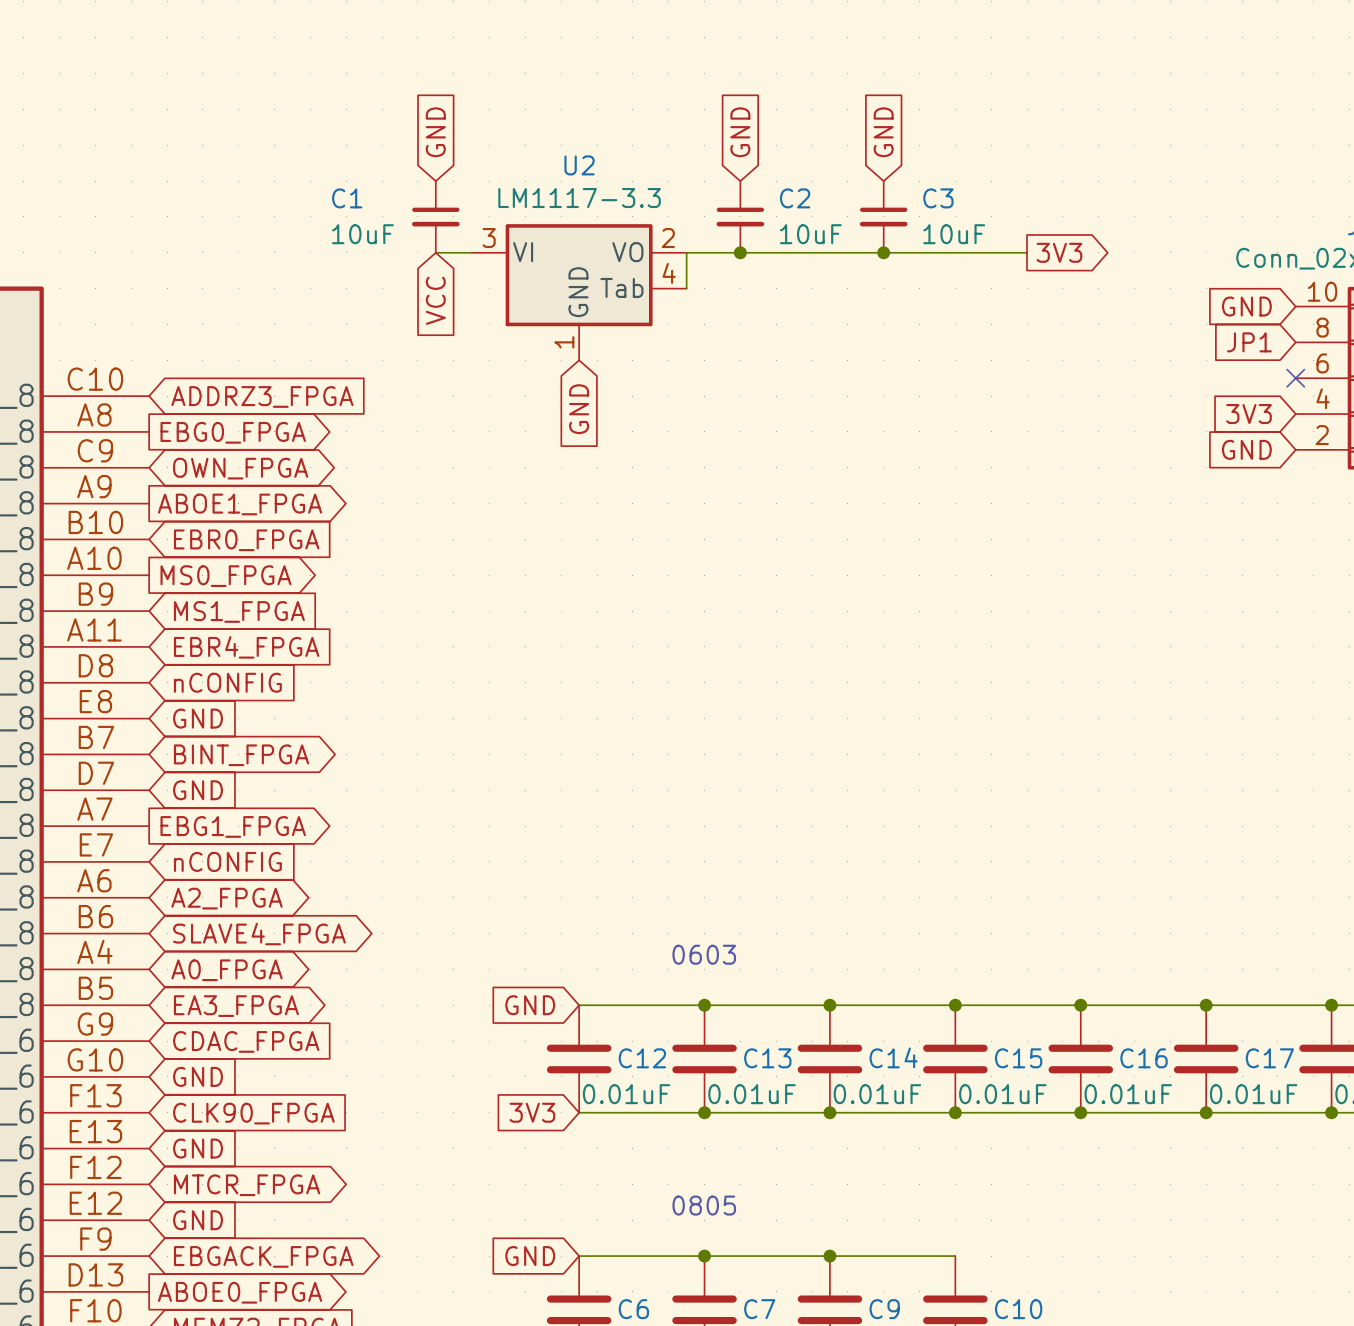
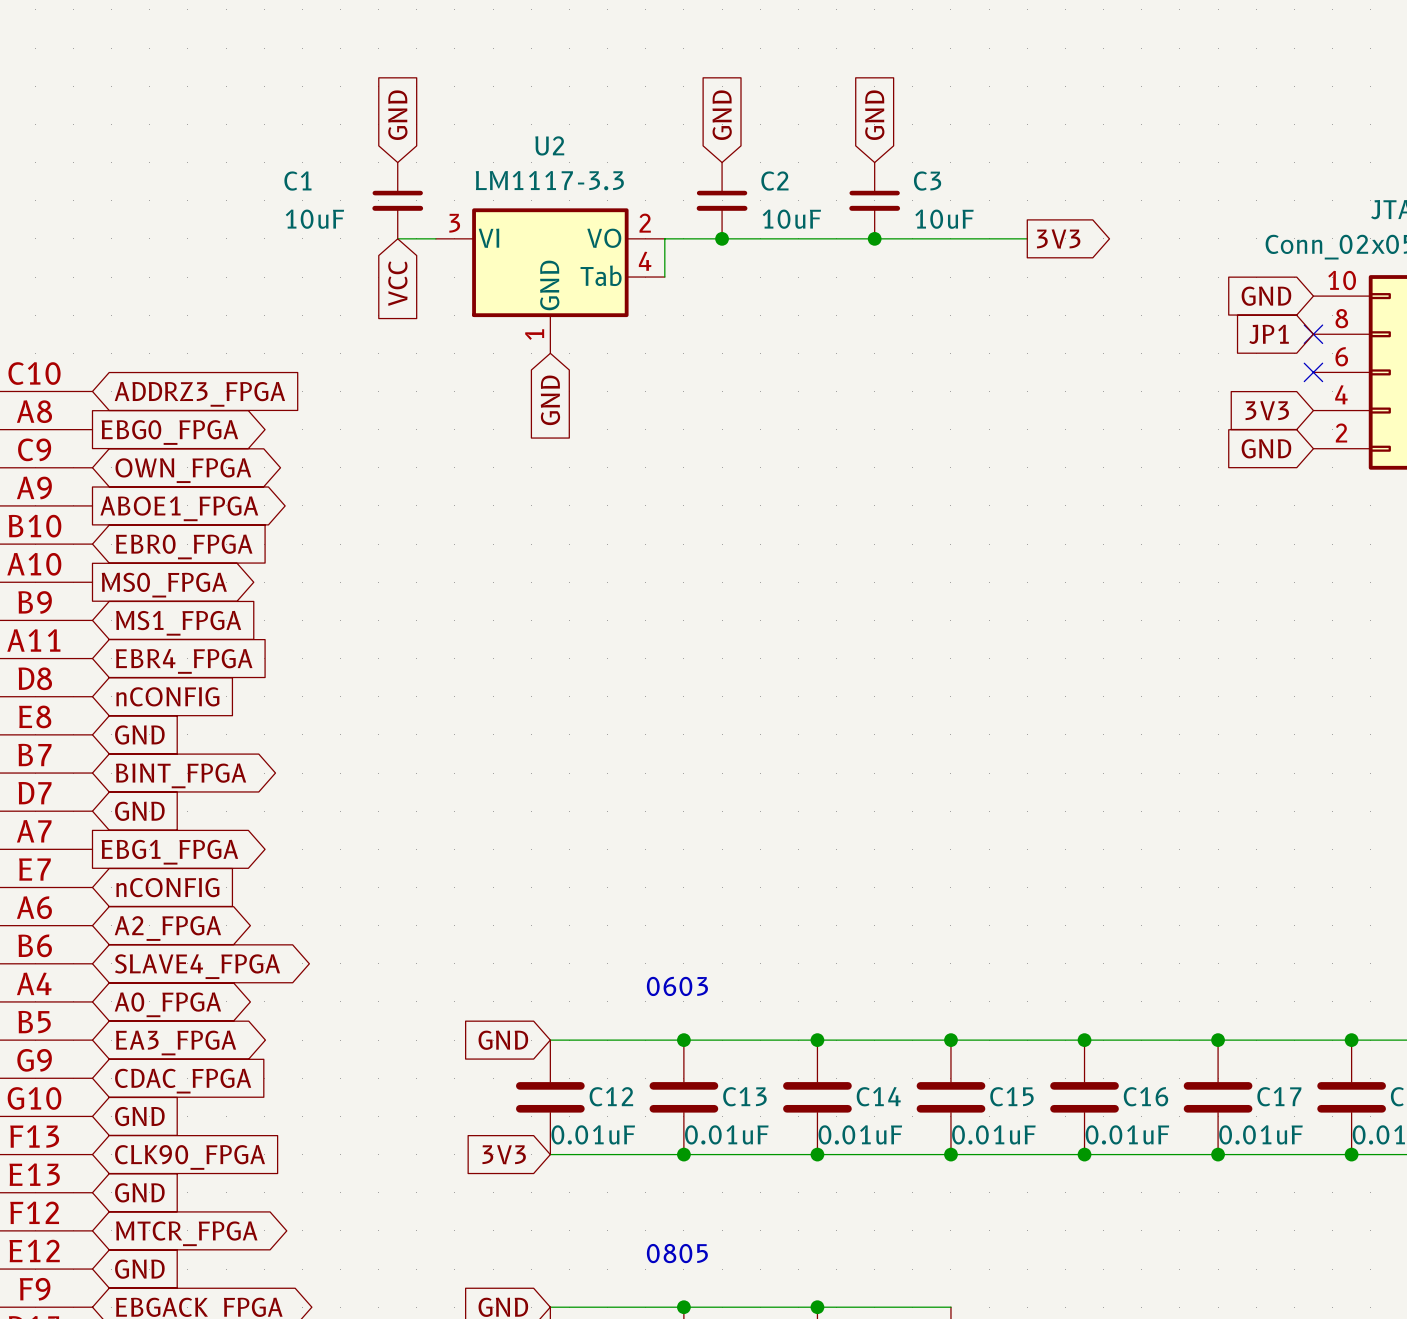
no-connect mark: none -> (1313, 334)

